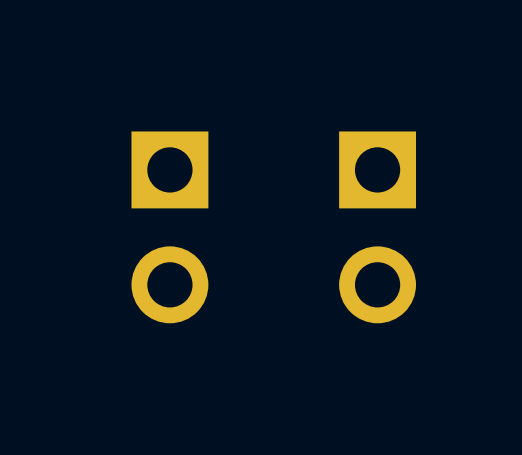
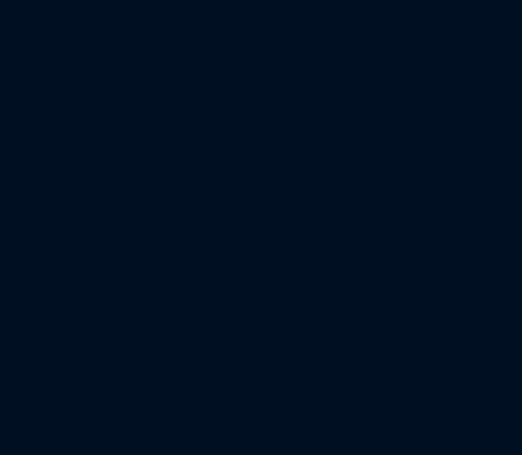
part: (169, 227) -> none
part: (377, 227) -> none

